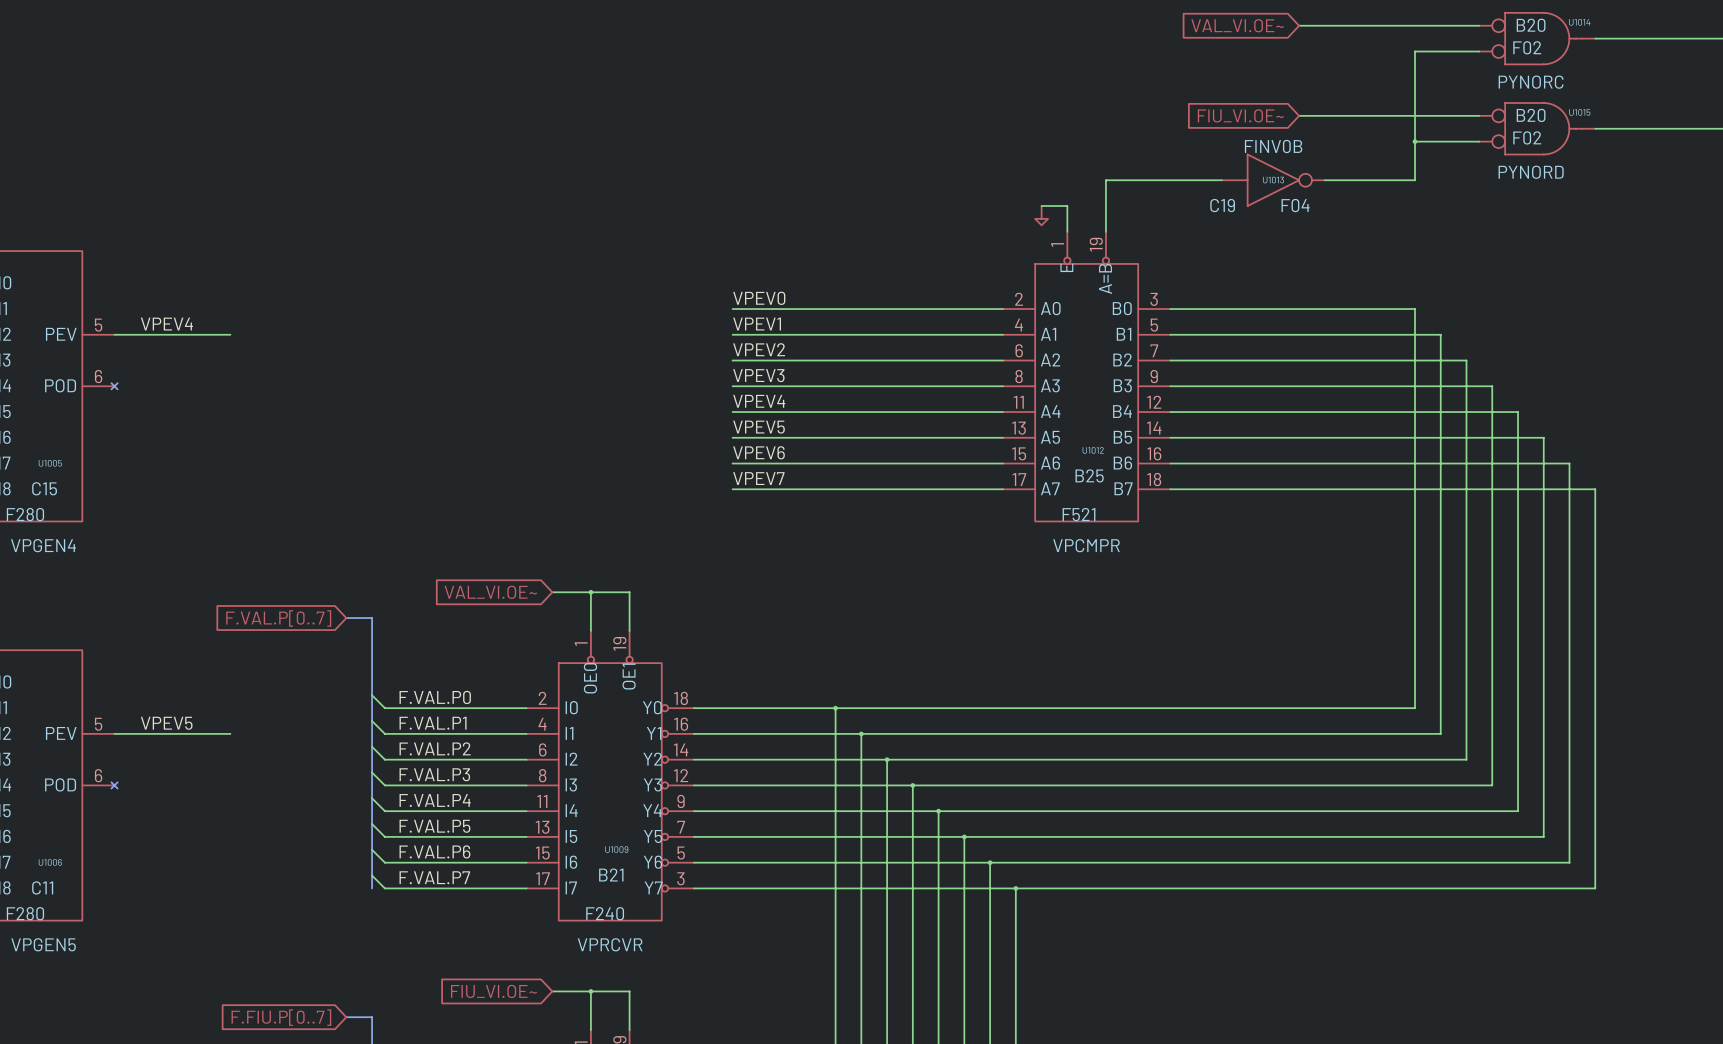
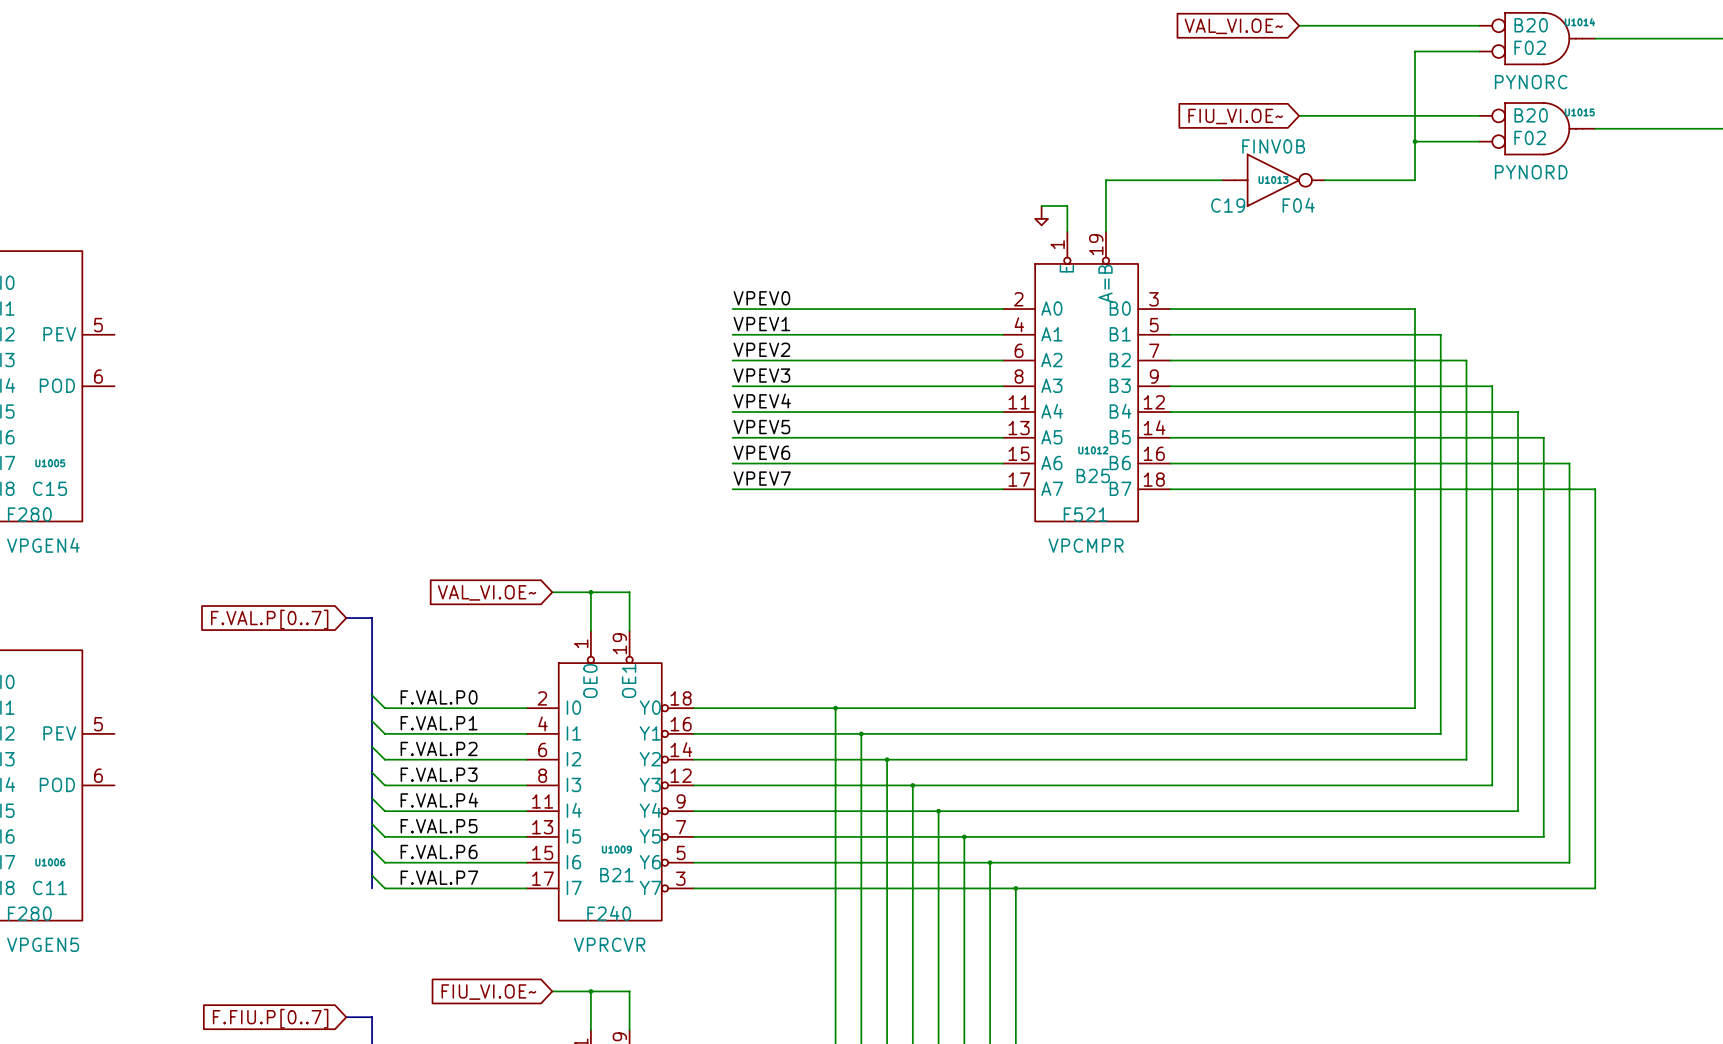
label: VPEV4 (166, 324) -> none
wire: (114, 334) (230, 334) -> none
no-connect mark: (114, 386) -> none
label: VPEV5 (166, 723) -> none
wire: (114, 733) (230, 733) -> none
no-connect mark: (114, 785) -> none

